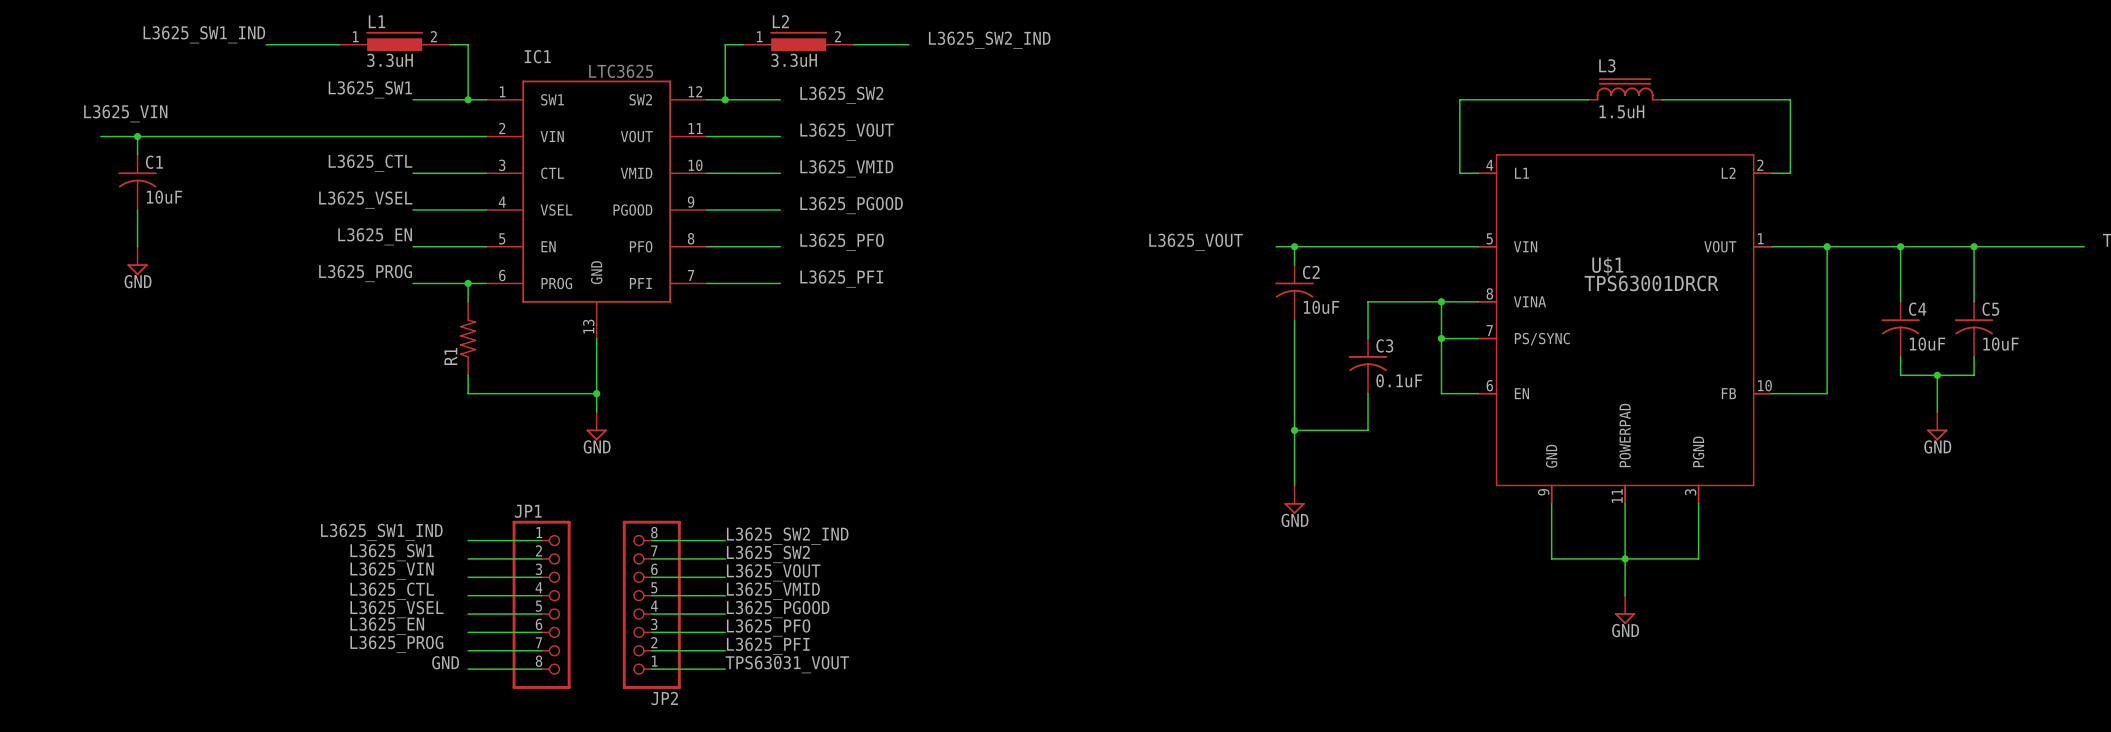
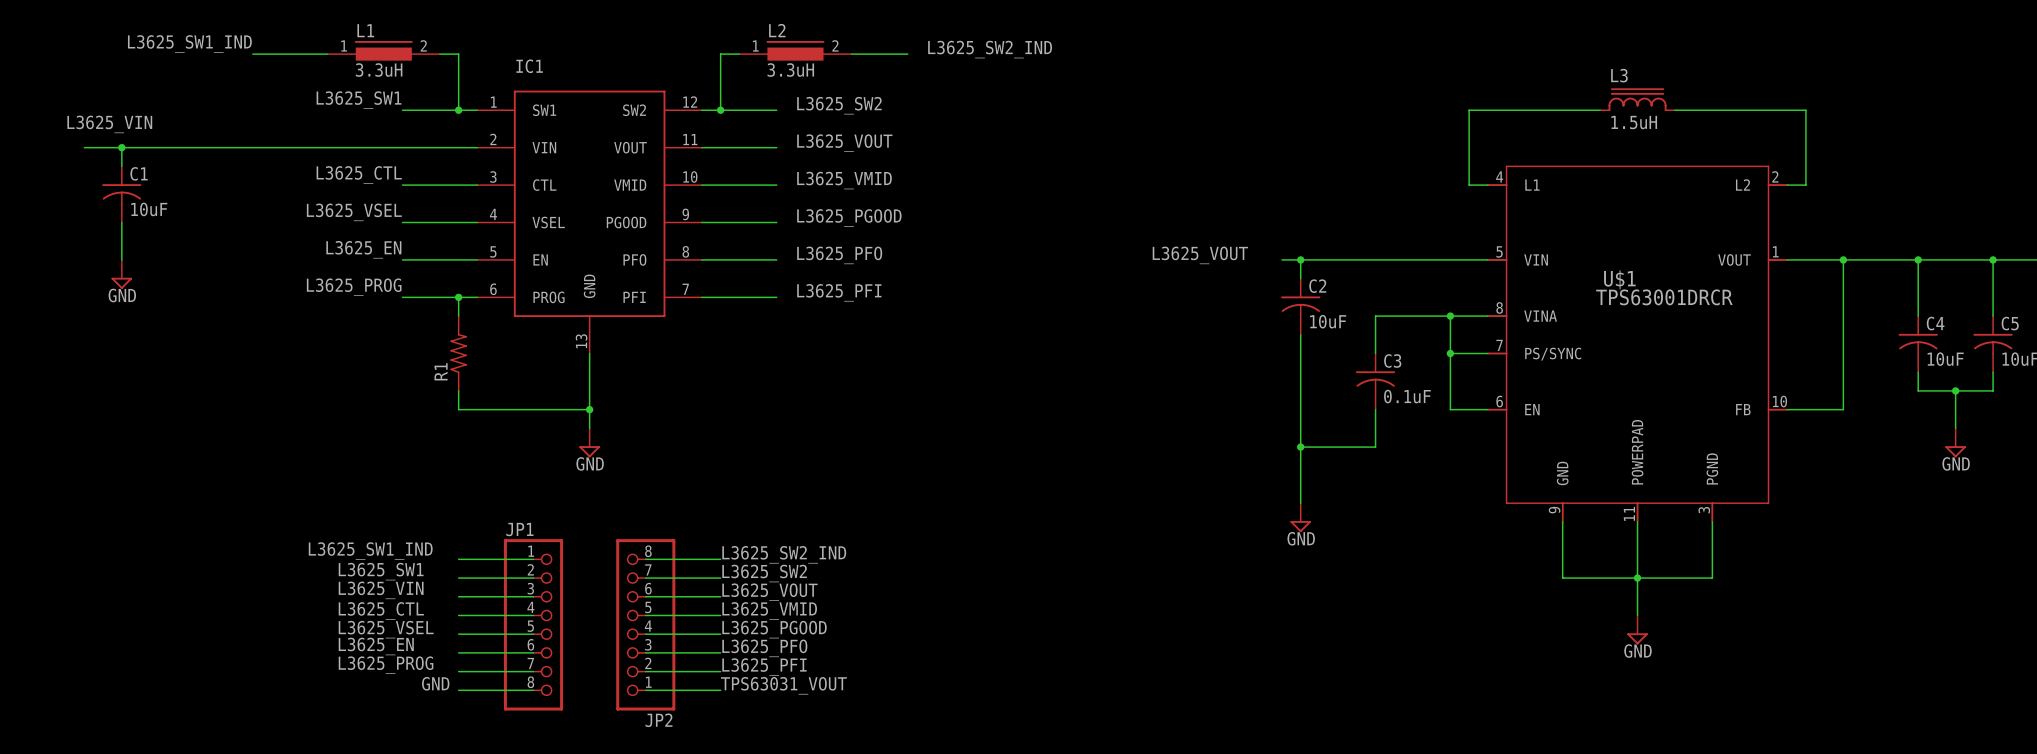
IC1 text: LTC3625 (621, 71) -> none

